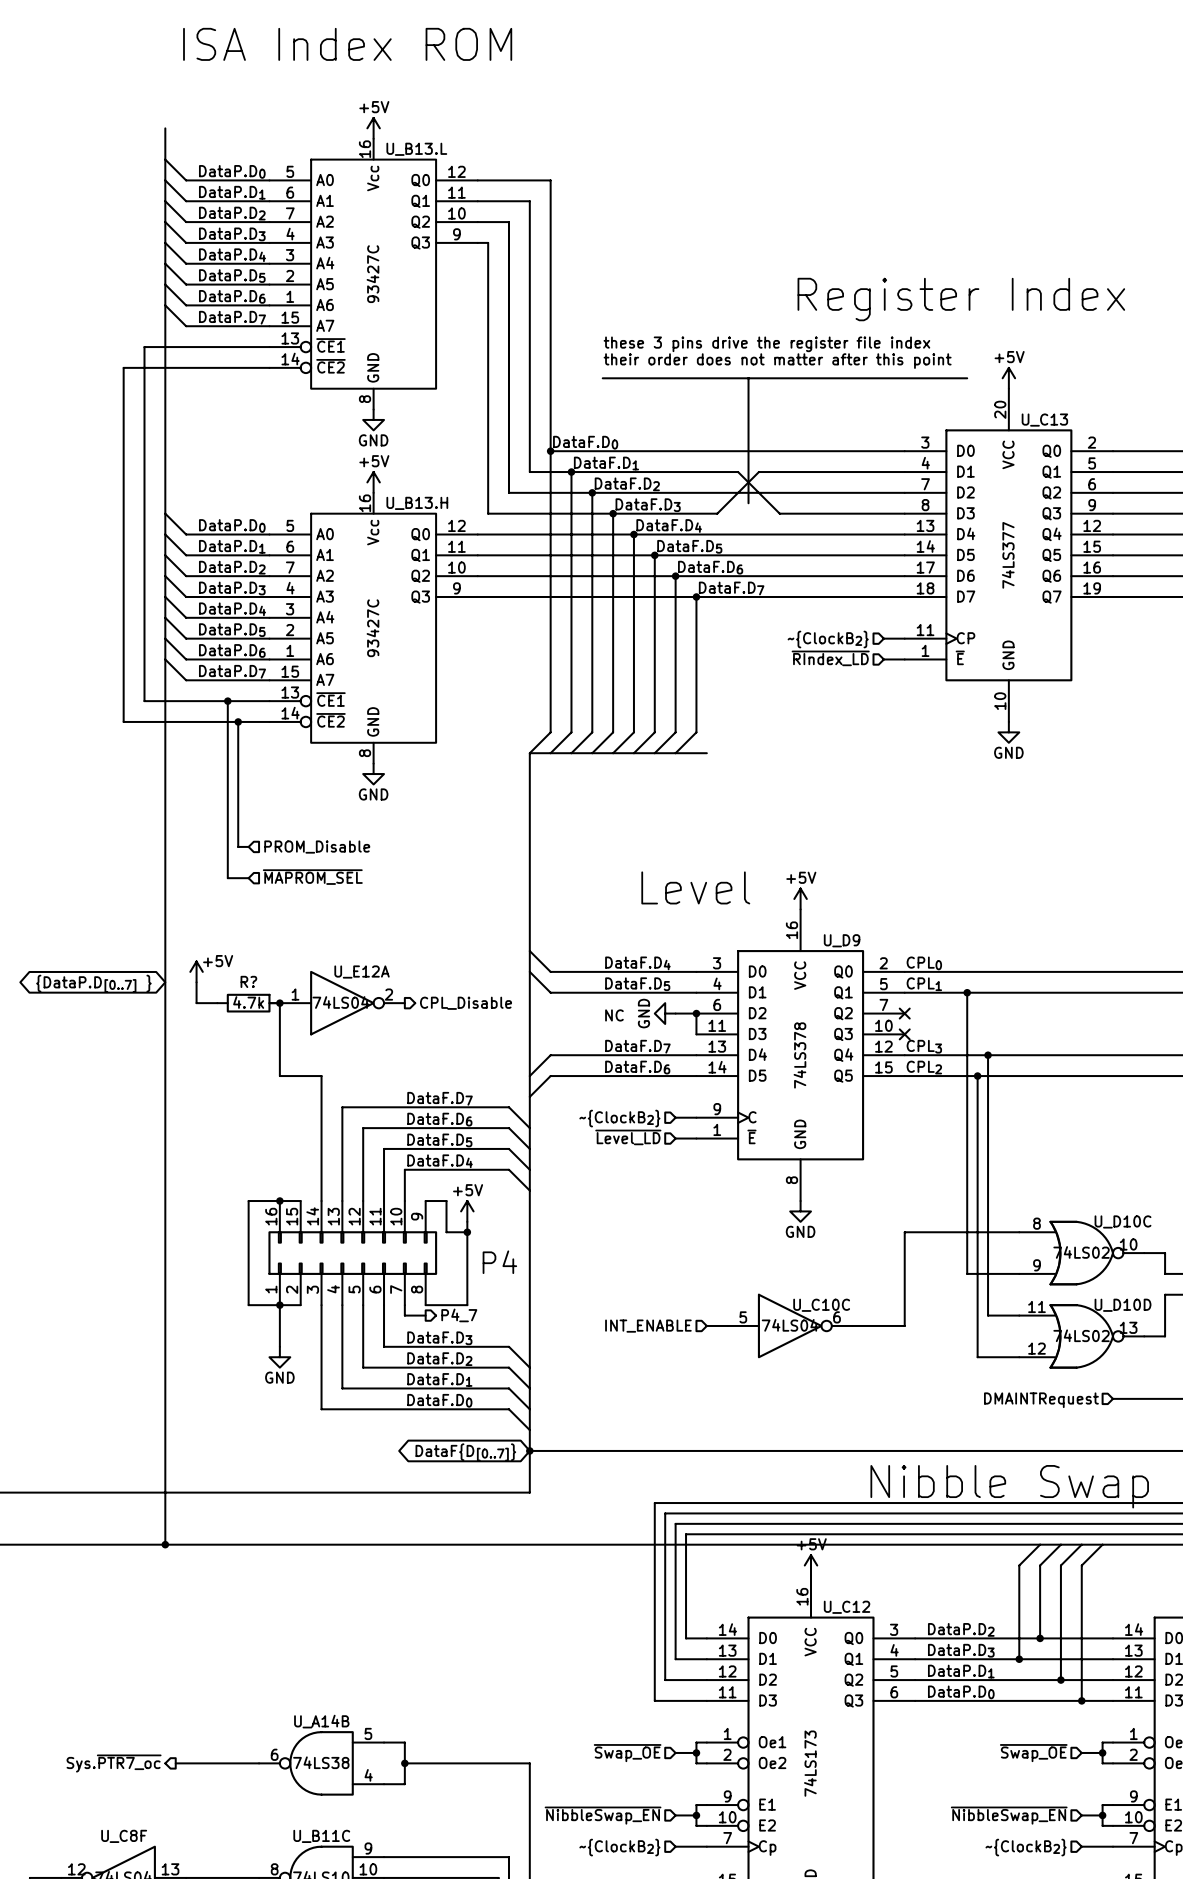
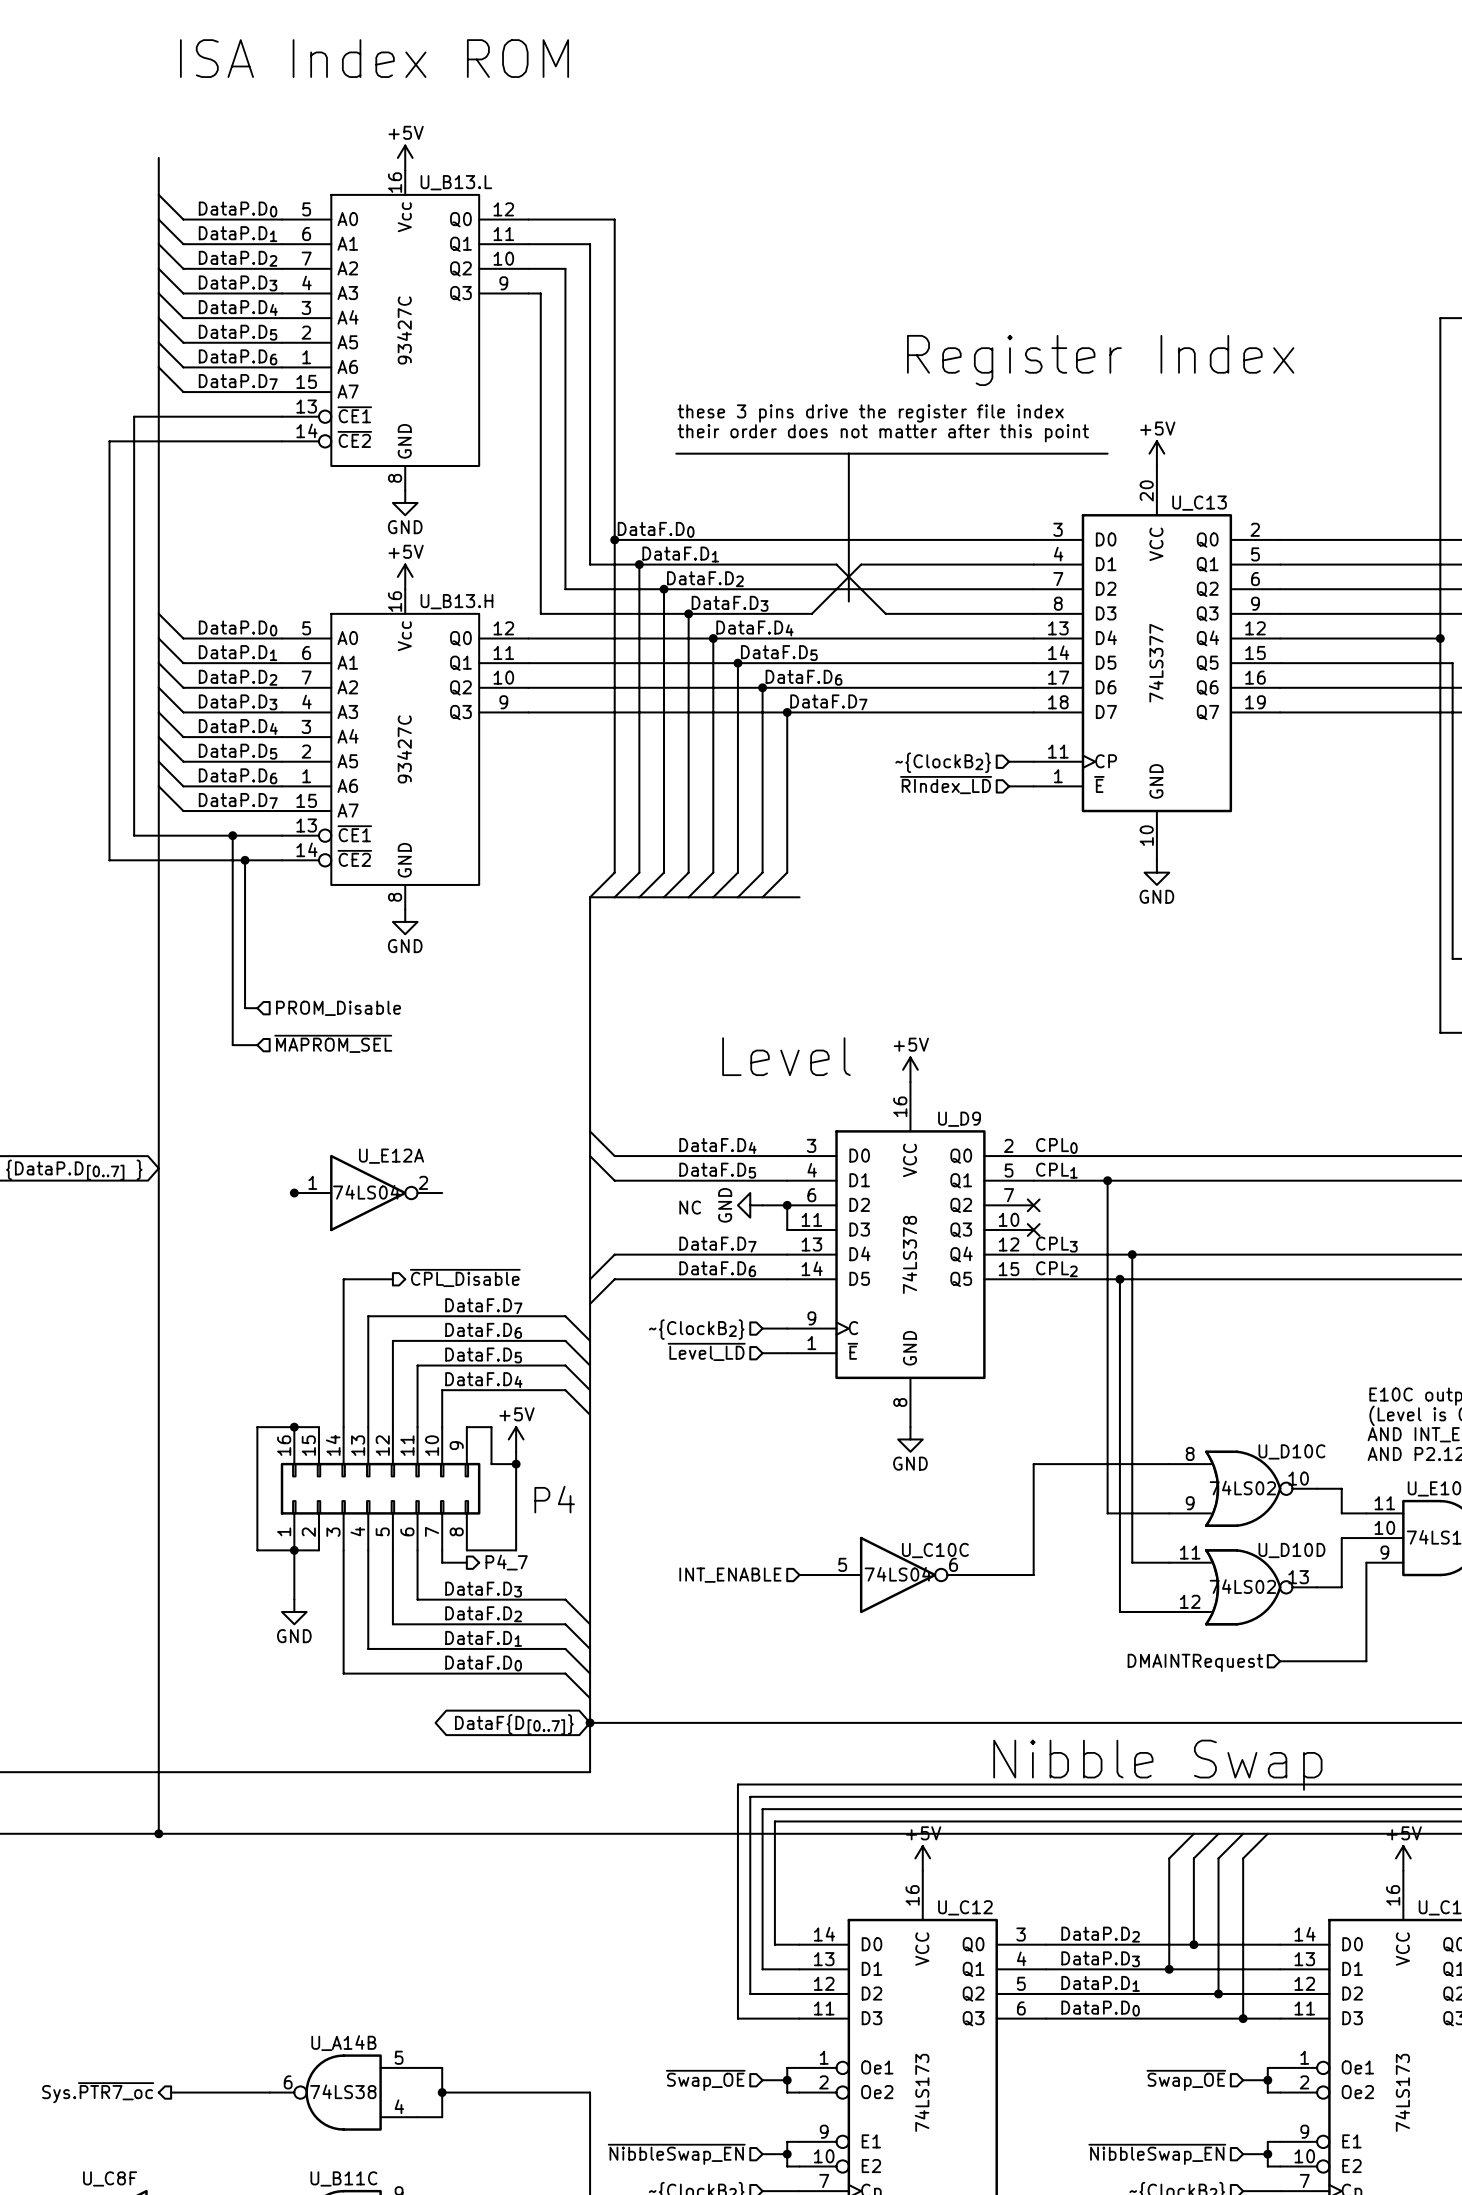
power symbol: +5V (196, 971) -> none
wire: (196, 982) (196, 1003) (217, 1003) -> none
R?: 4.7k (248, 1003) -> none
wire: (269, 1003) (279, 1003) (279, 1076) (321, 1076) -> (392, 1279) (343, 1279)
hierarchical label: CPL_Disable (466, 1003) -> none
hierarchical label: none -> ~{CPL_Disable} (465, 1277)

